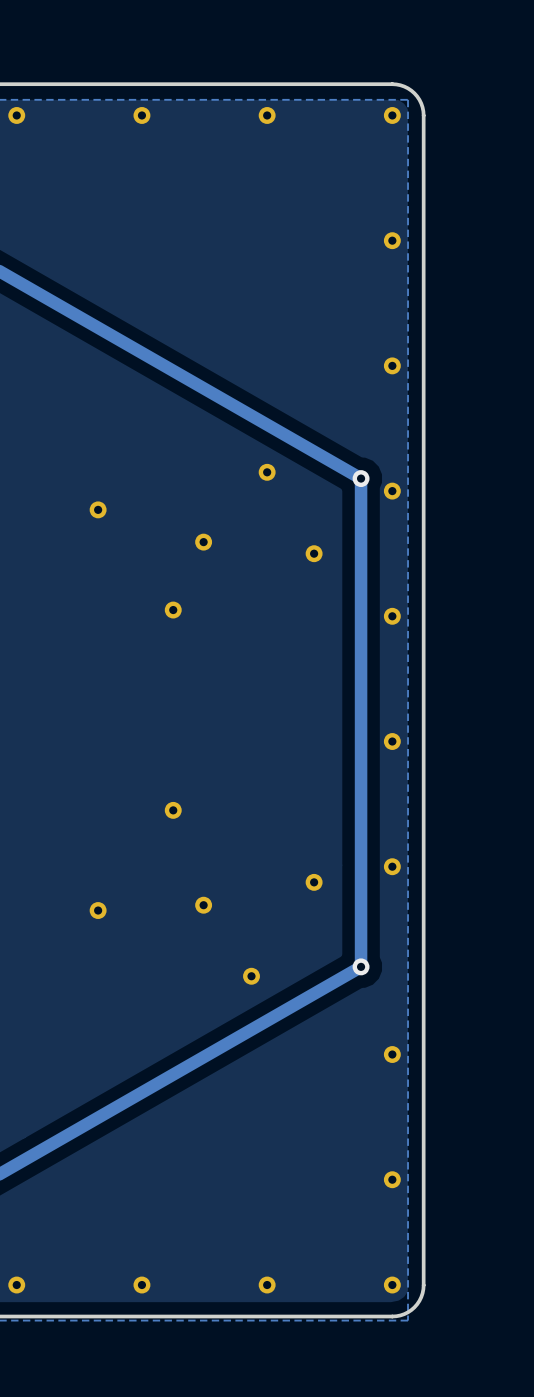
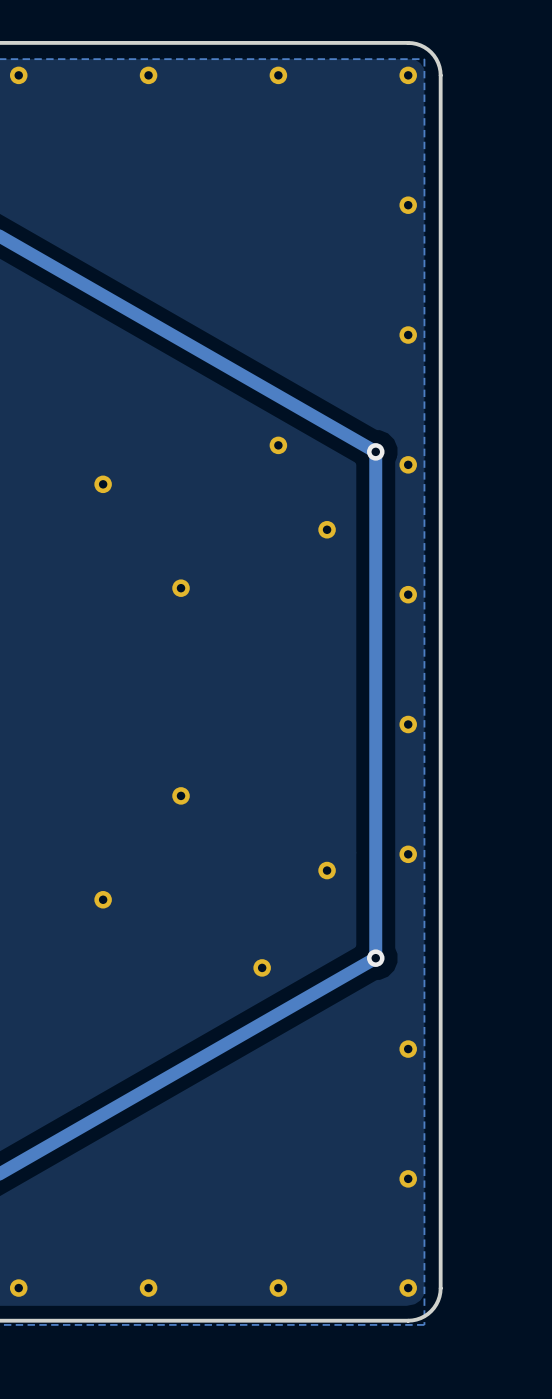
part: (203, 542) -> none
part: (203, 905) -> none

